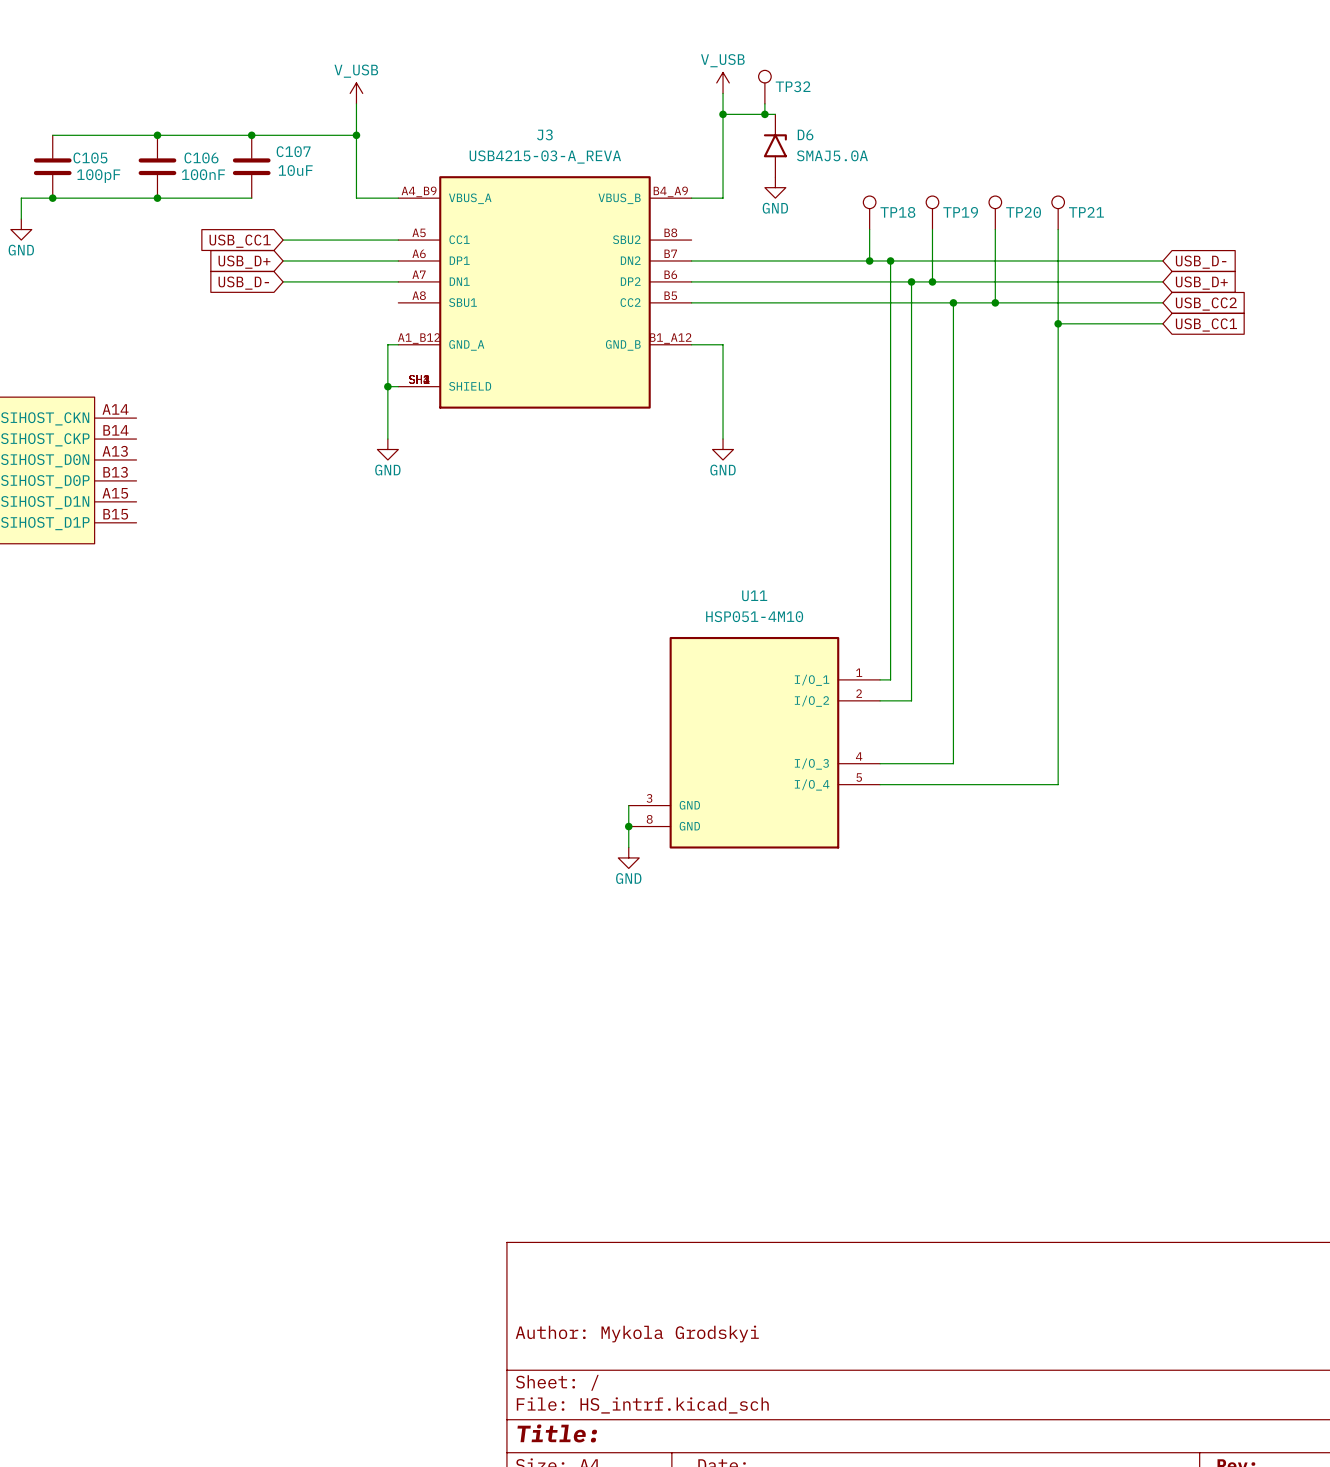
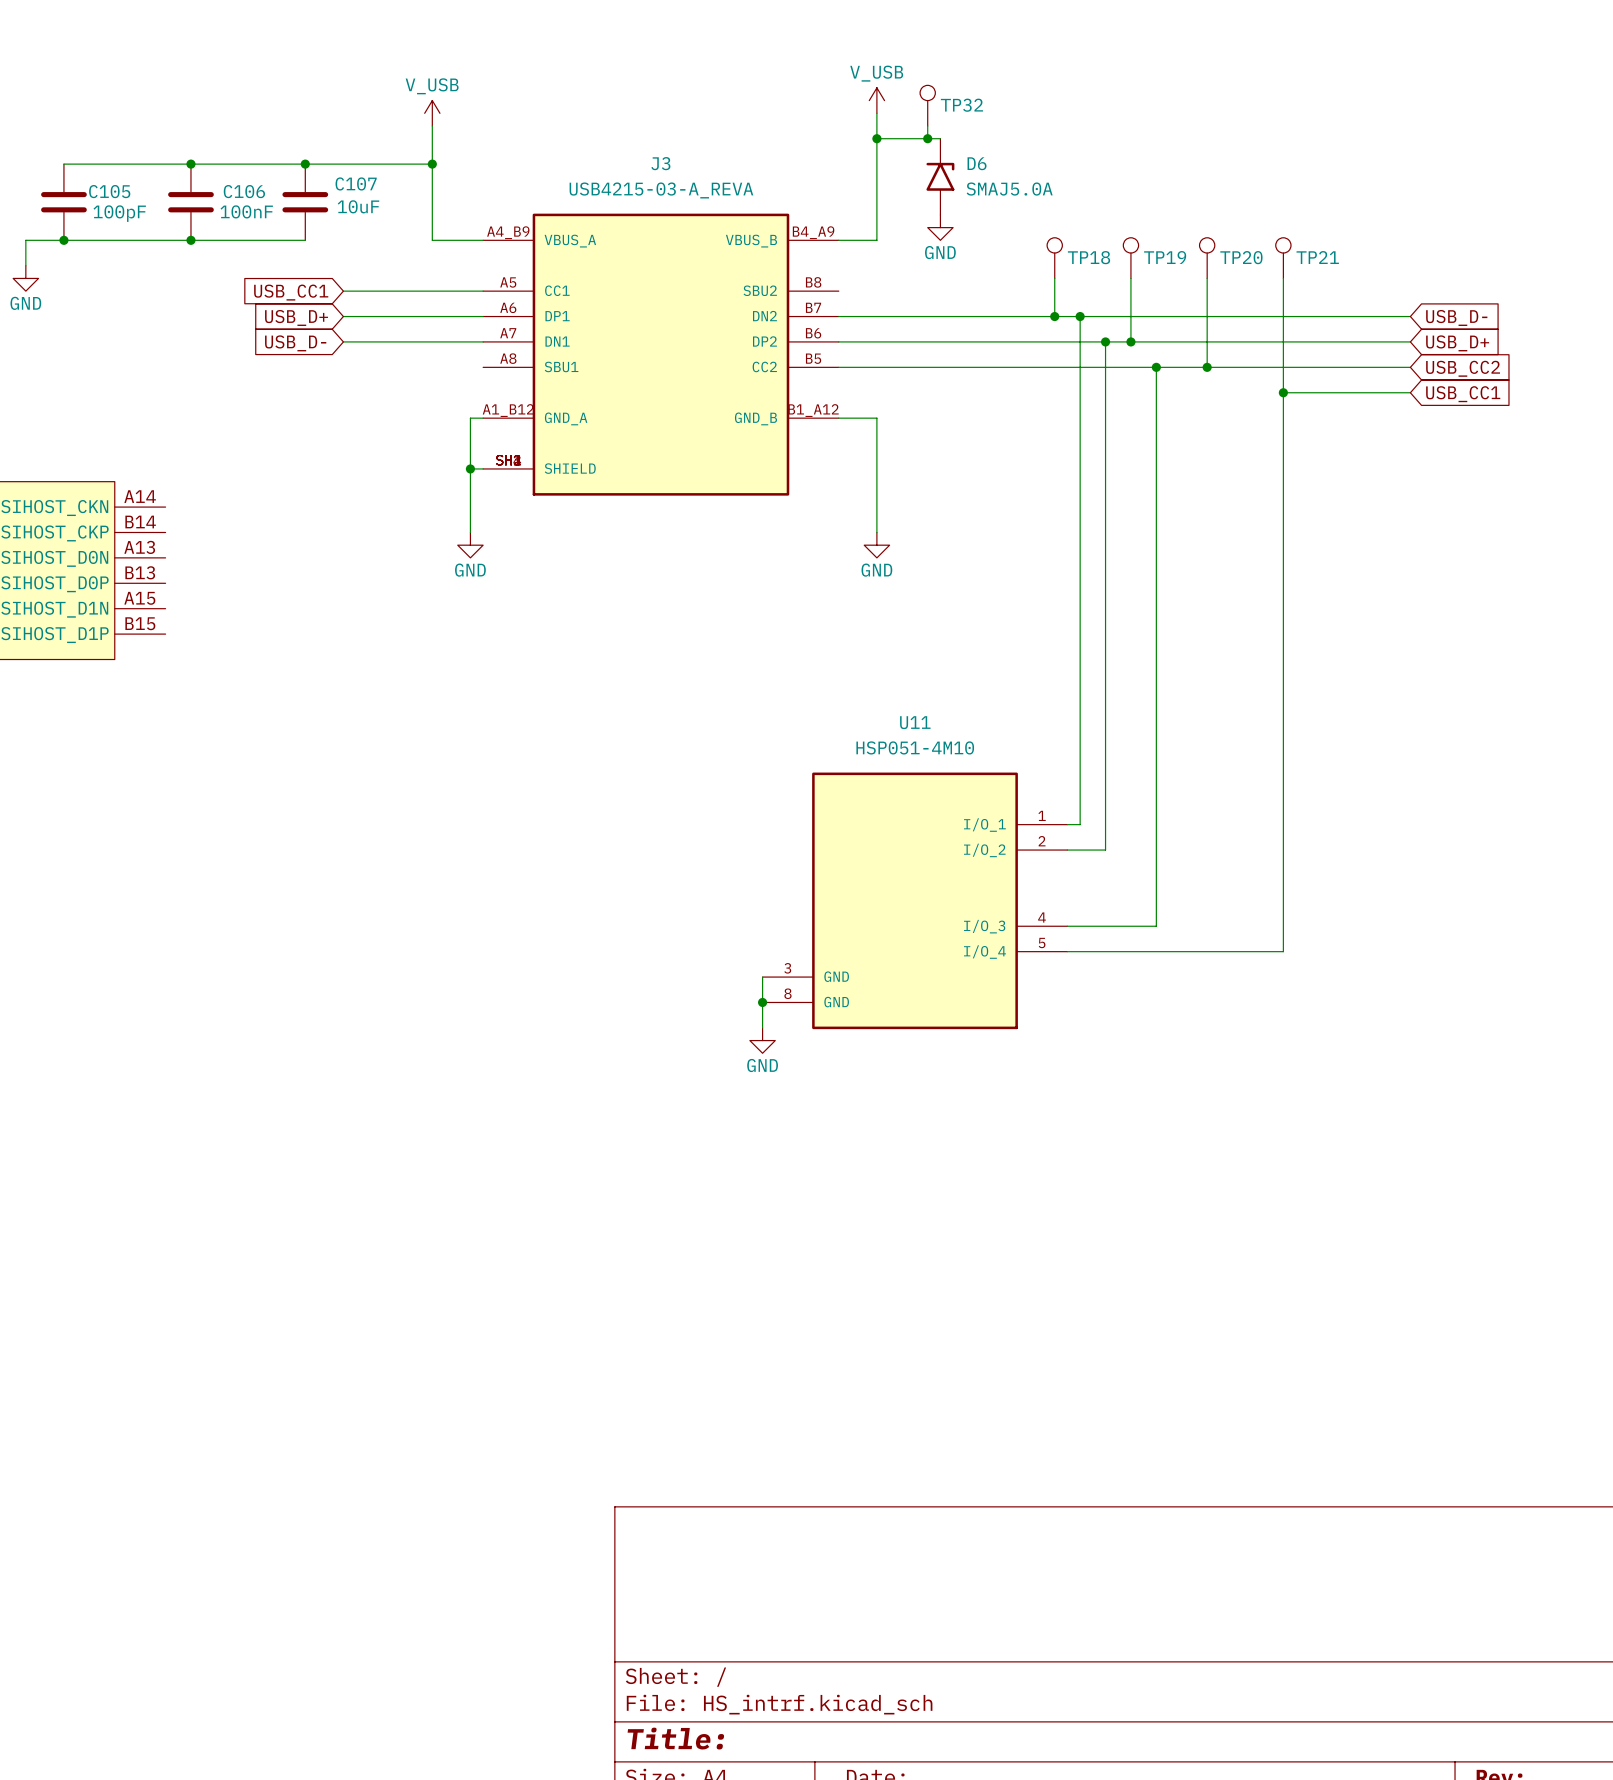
title block: Author: Mykola Grodskyi (637, 1333) -> none

